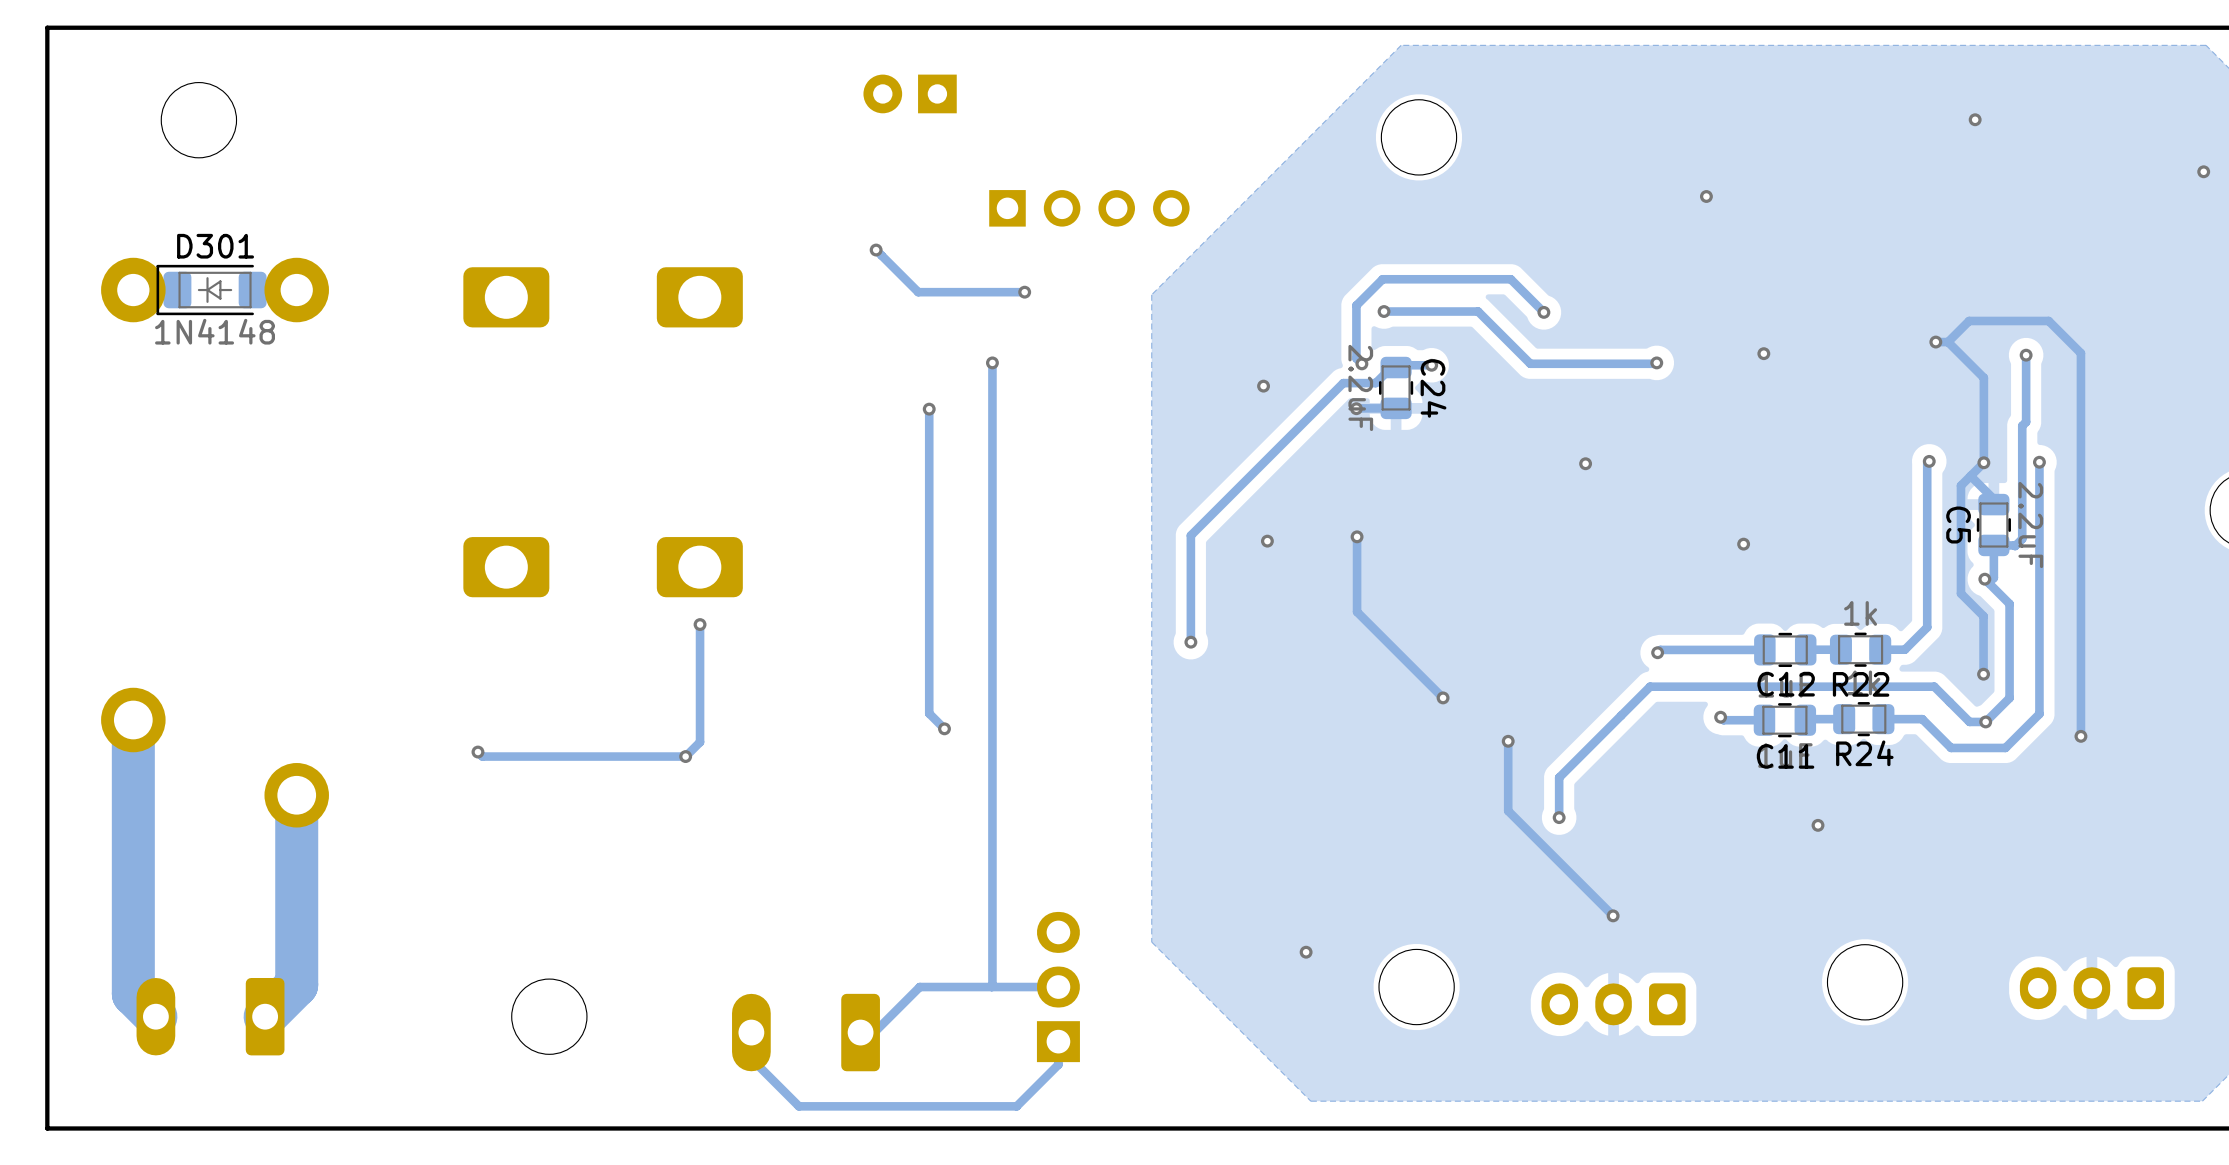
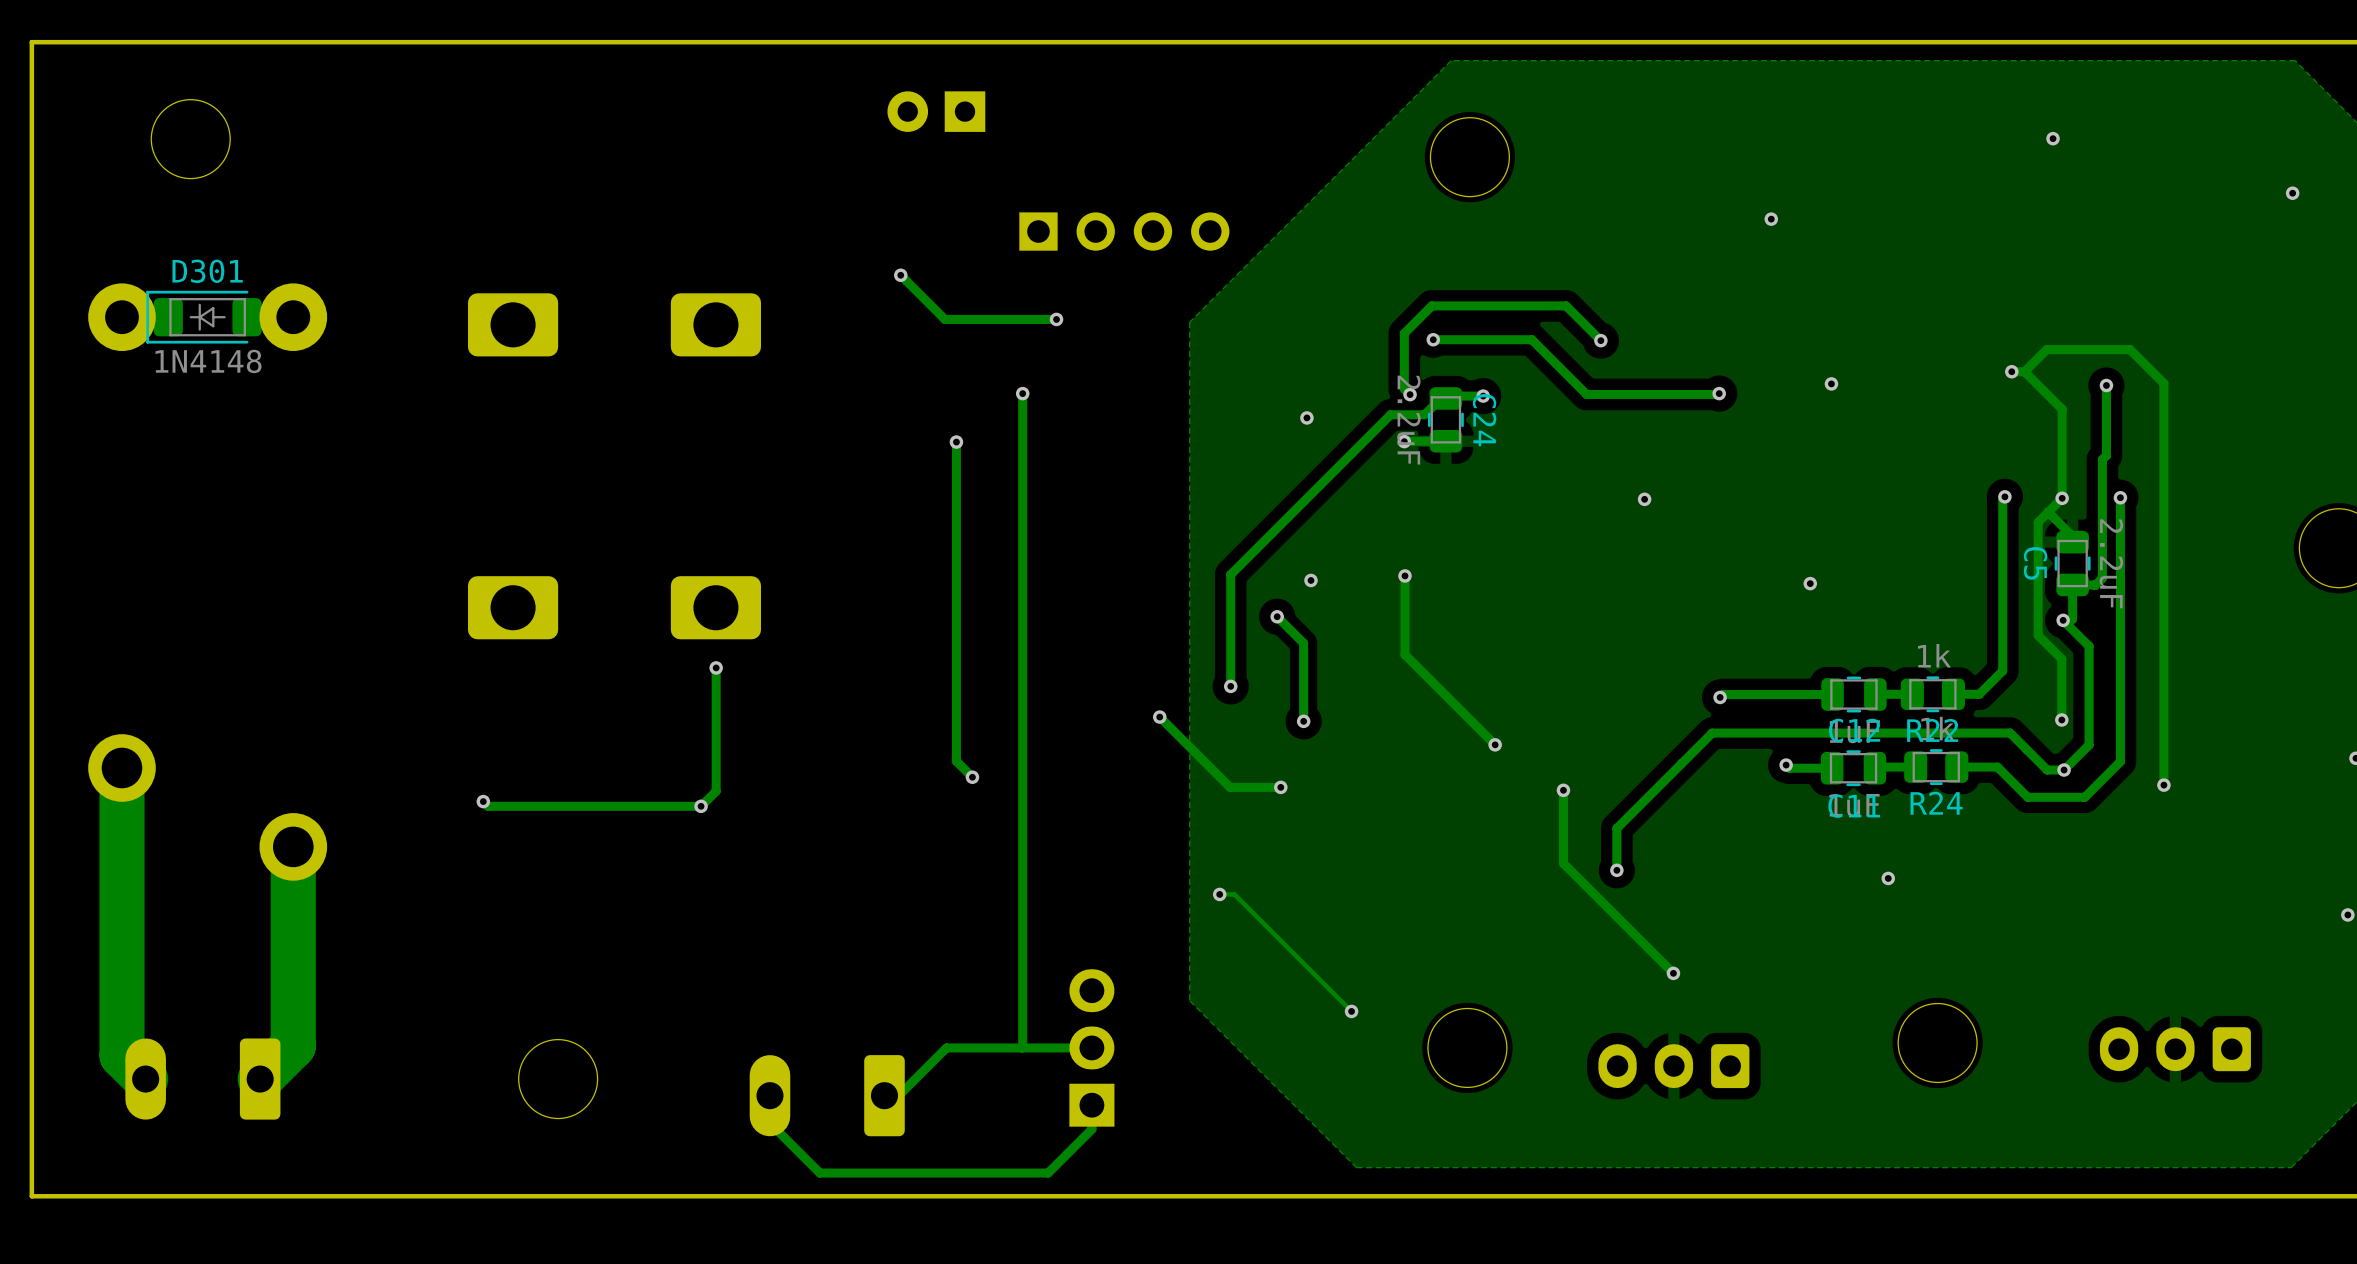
track: none -> (1277, 616) (1303, 643) (1303, 721)
via: none -> (1277, 616)
track: none -> (1159, 717) (1230, 787) (1280, 787)
via: none -> (1159, 717)
via: none -> (1303, 721)
via: none -> (1280, 787)
track: none -> (1219, 894) (1234, 894) (1351, 1011)
via: none -> (1219, 894)

